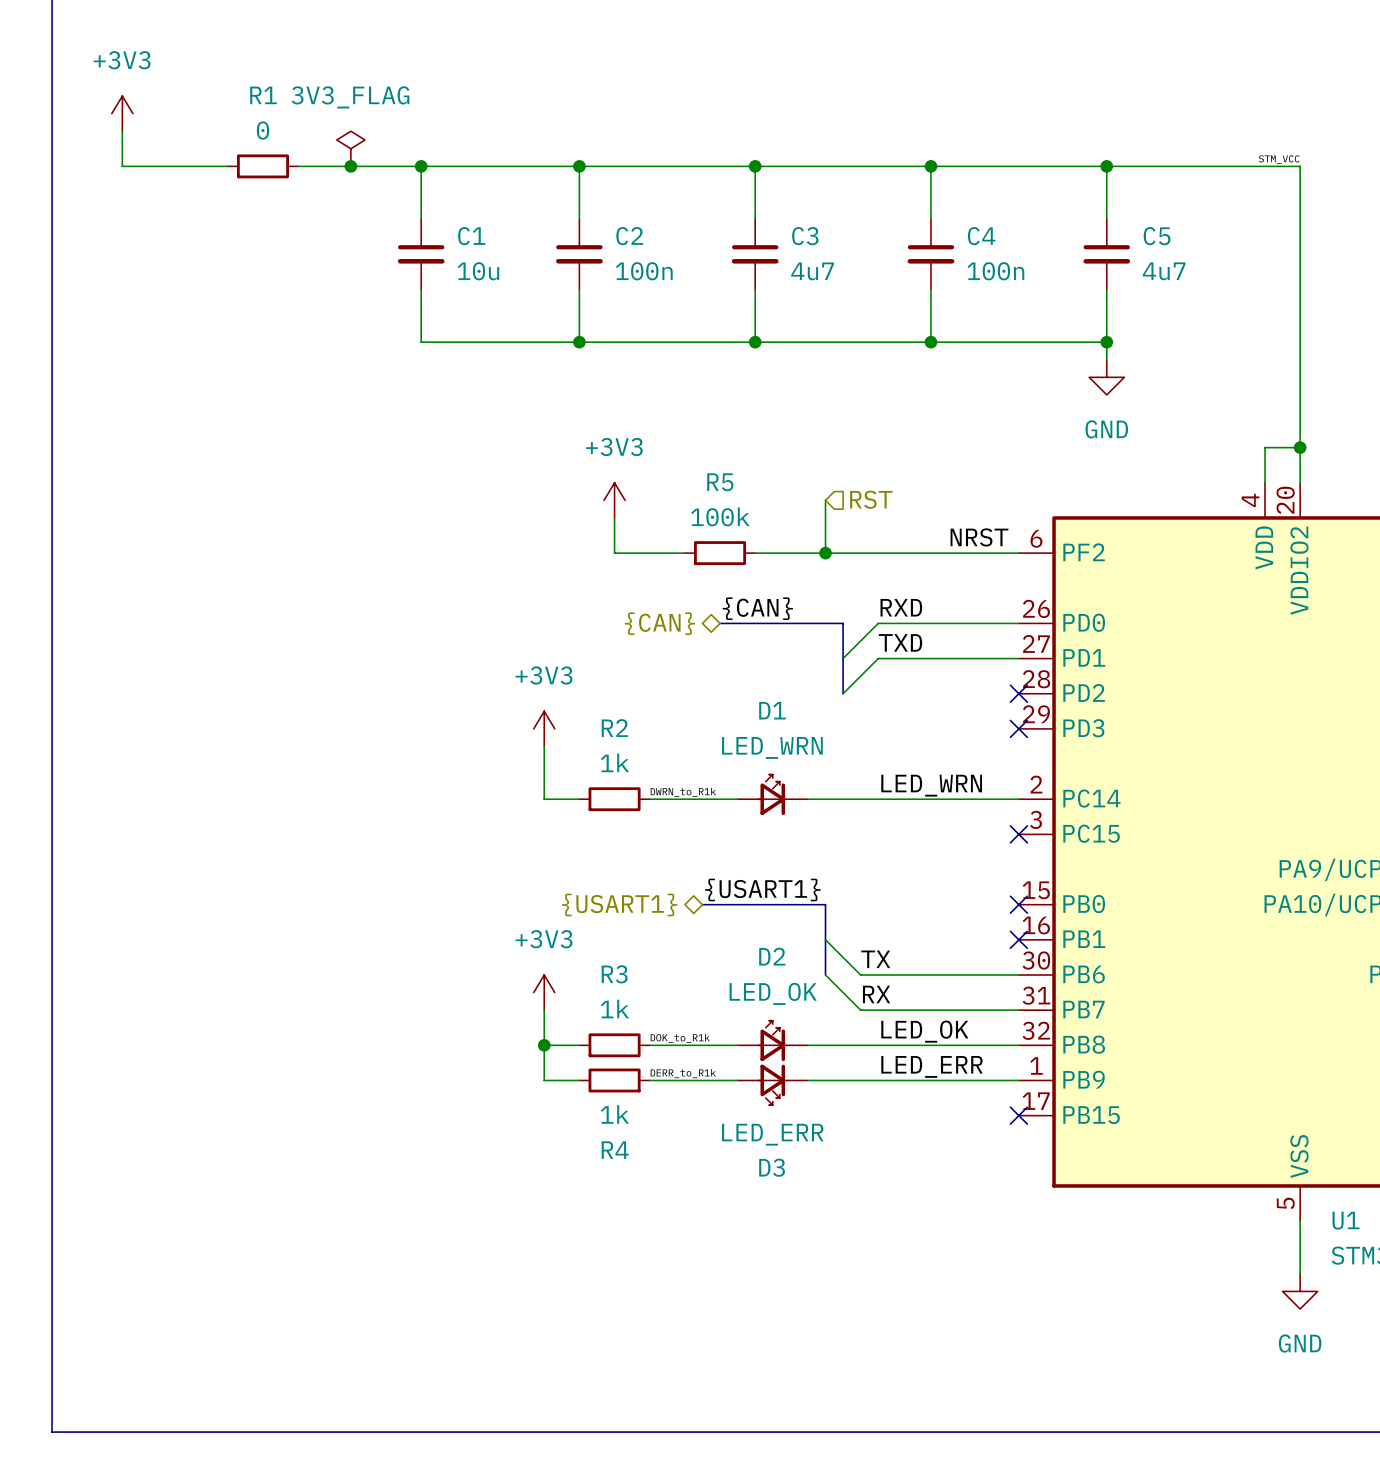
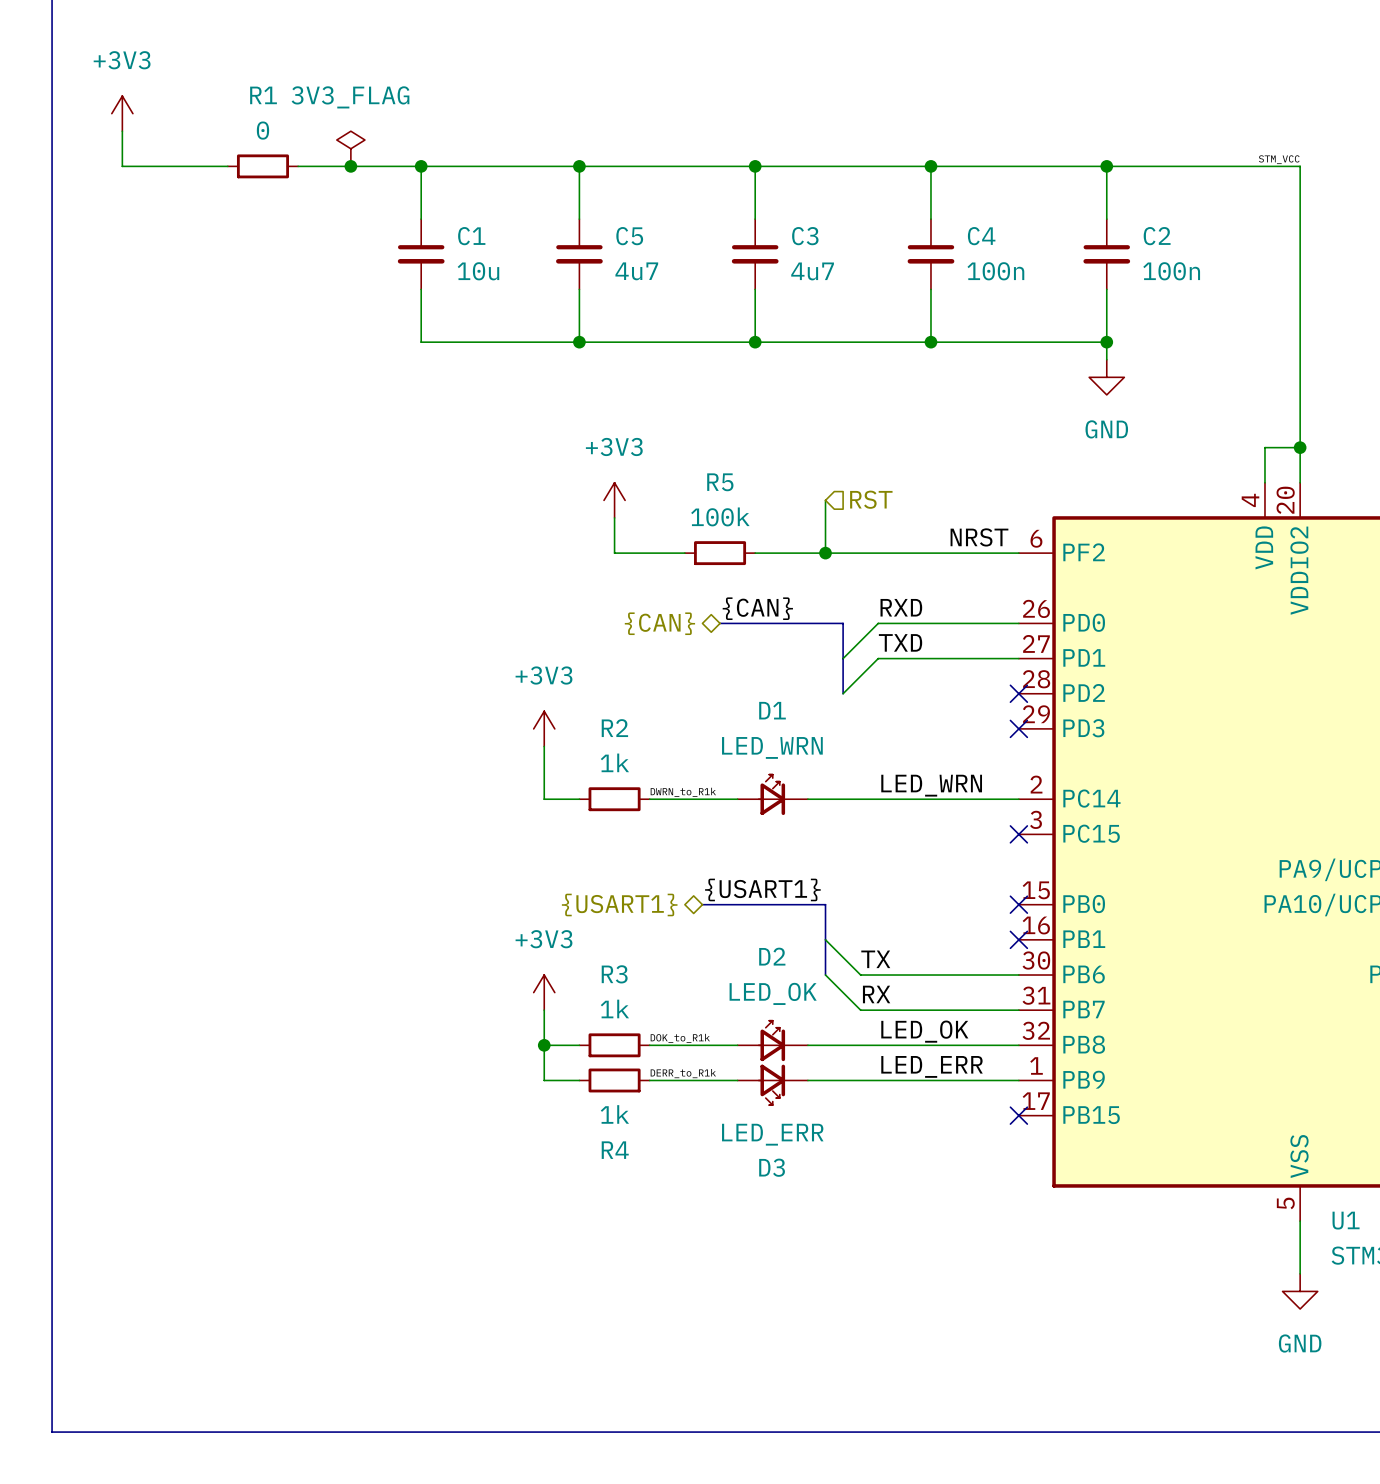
C2 name: C2 (629, 236) -> C5 (629, 236)
C5 name: C5 (1157, 236) -> C2 (1157, 236)
C2 value: 100n (644, 271) -> 4u7 (636, 271)
C5 value: 4u7 (1164, 271) -> 100n (1171, 271)

